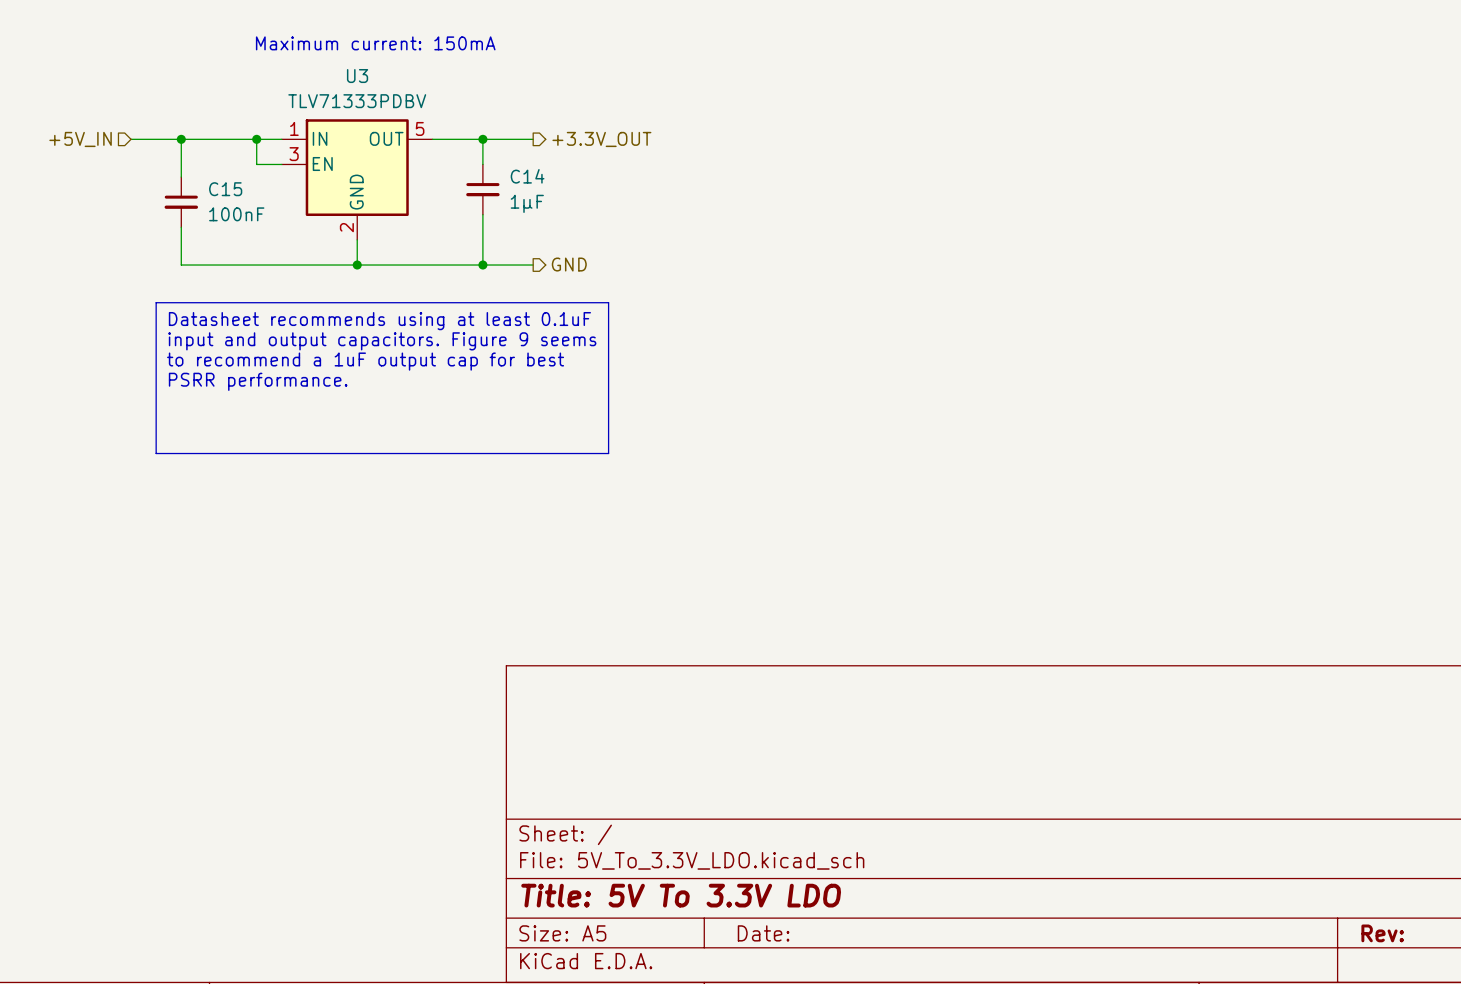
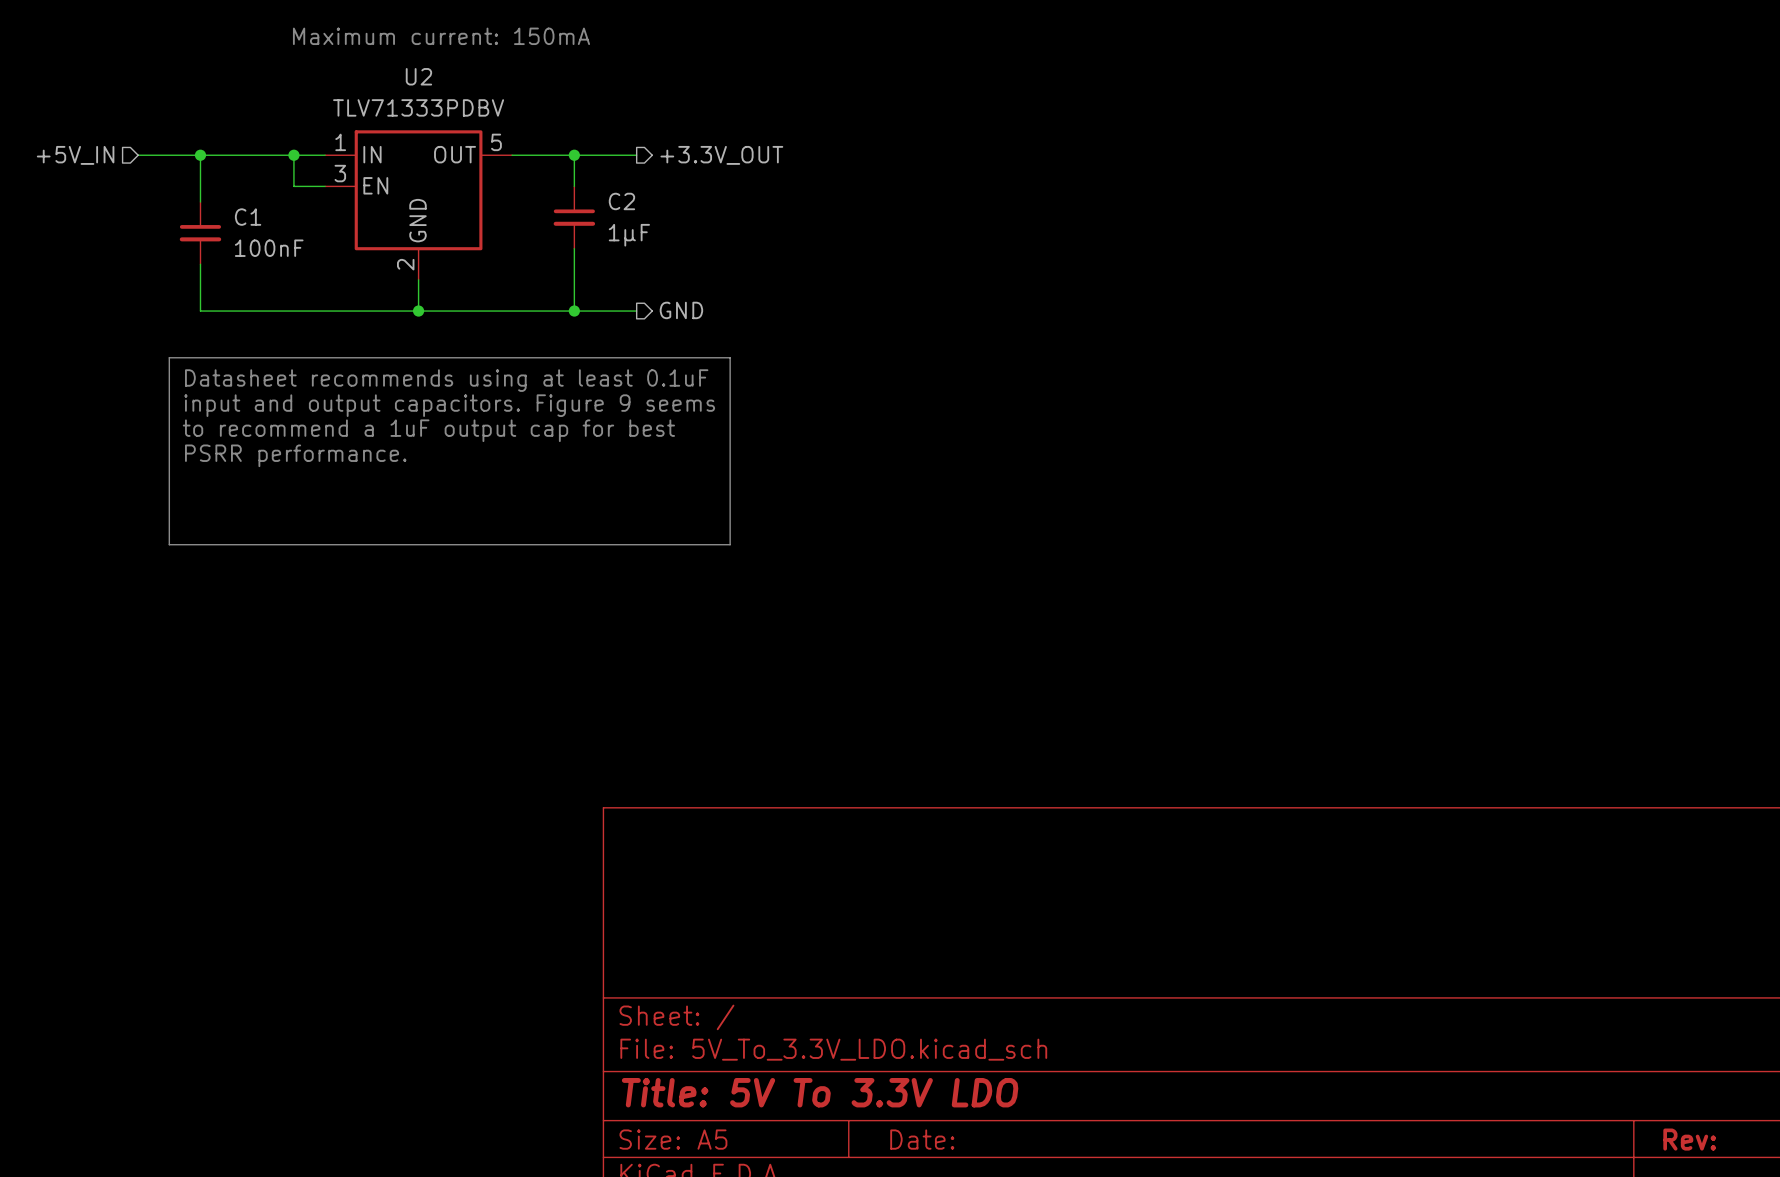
U3 name: U3 (357, 76) -> U2 (418, 76)
C14 name: C14 (527, 176) -> C2 (621, 201)
C15 name: C15 (225, 189) -> C1 (248, 217)

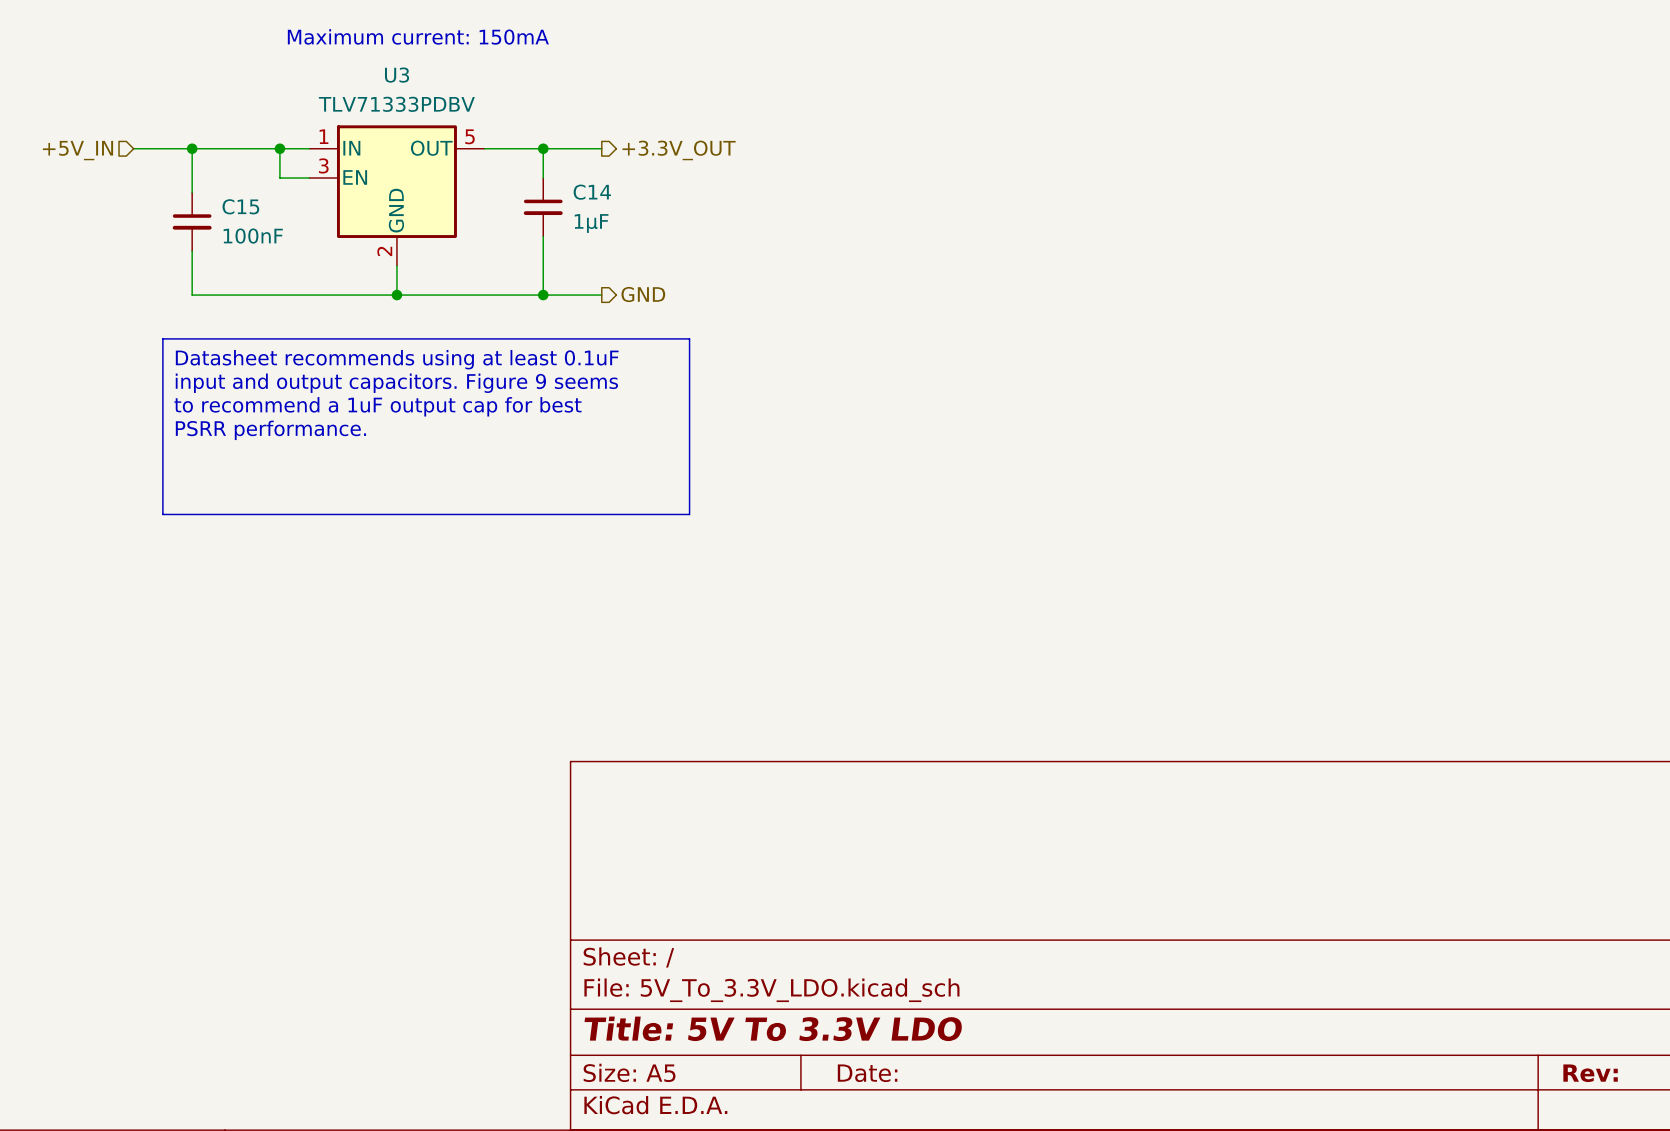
U2 name: U2 (418, 76) -> U3 (397, 75)
C2 name: C2 (621, 201) -> C14 (592, 192)
C1 name: C1 (248, 217) -> C15 (240, 206)

